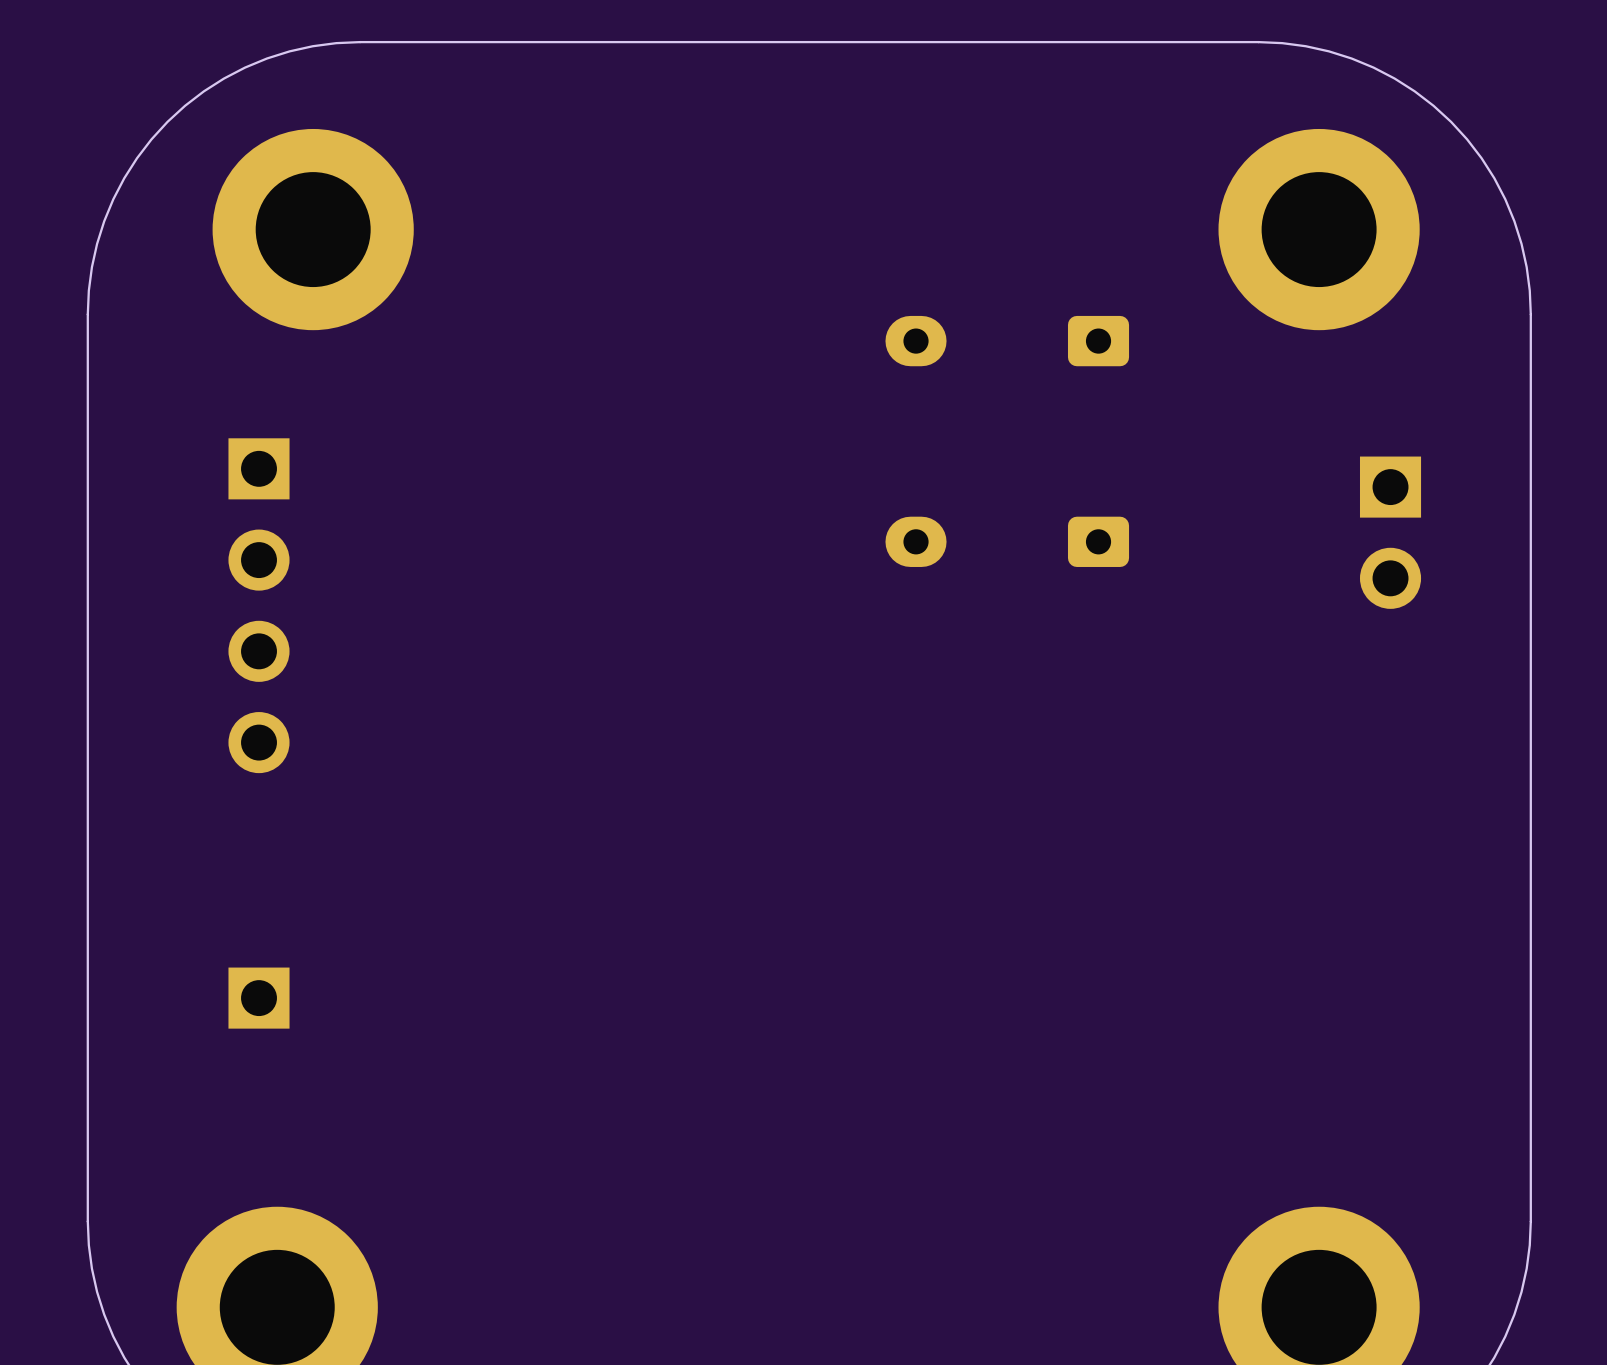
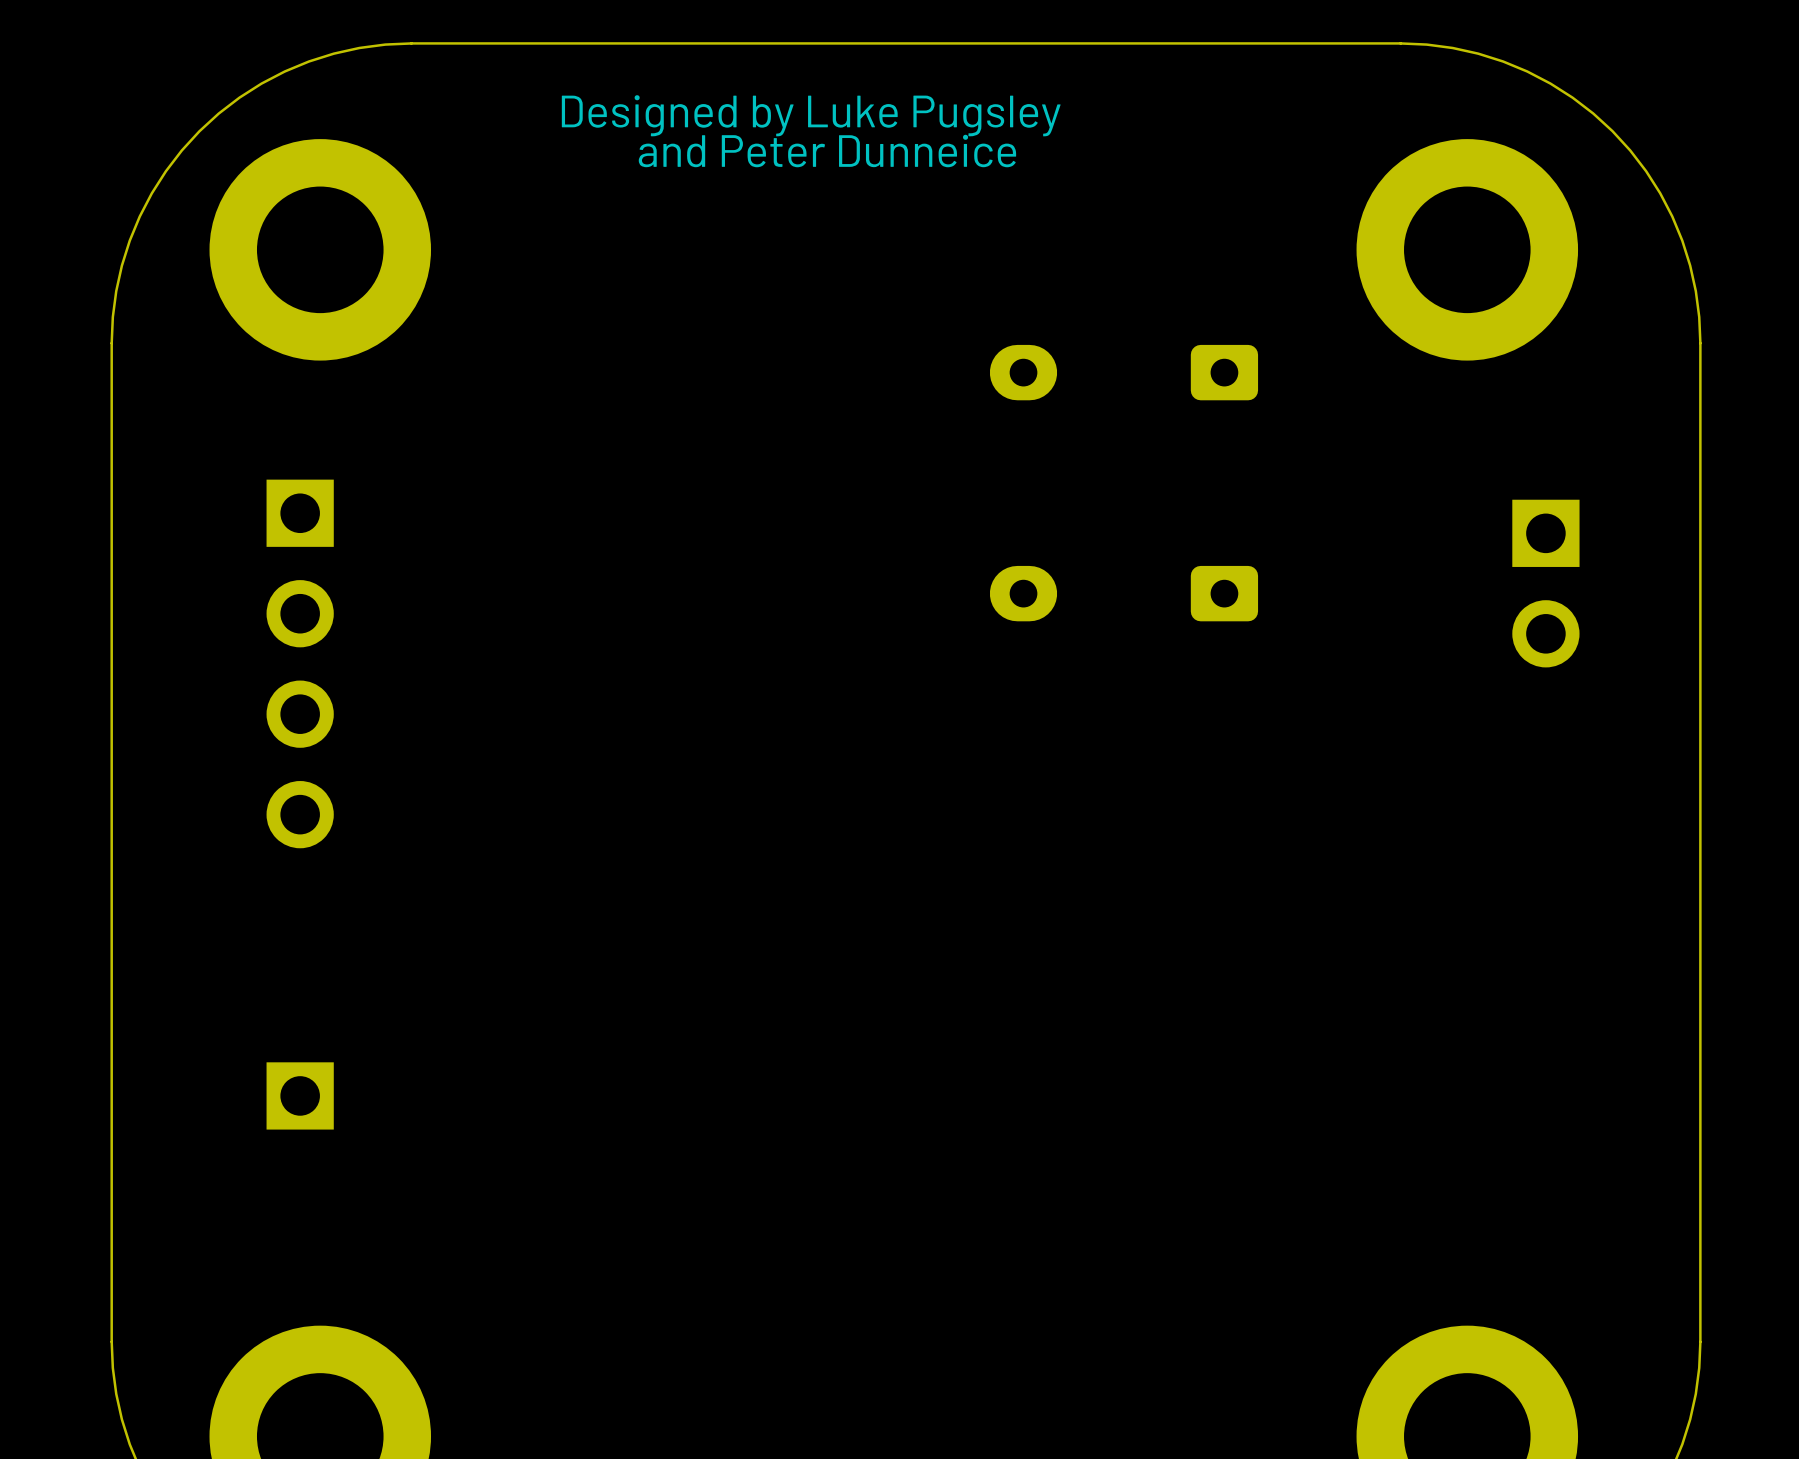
text: none -> Designed by Luke Pugsley (811, 115)
text: none -> and Peter Dunneice (827, 151)
part position: (313, 229) -> (320, 249)

